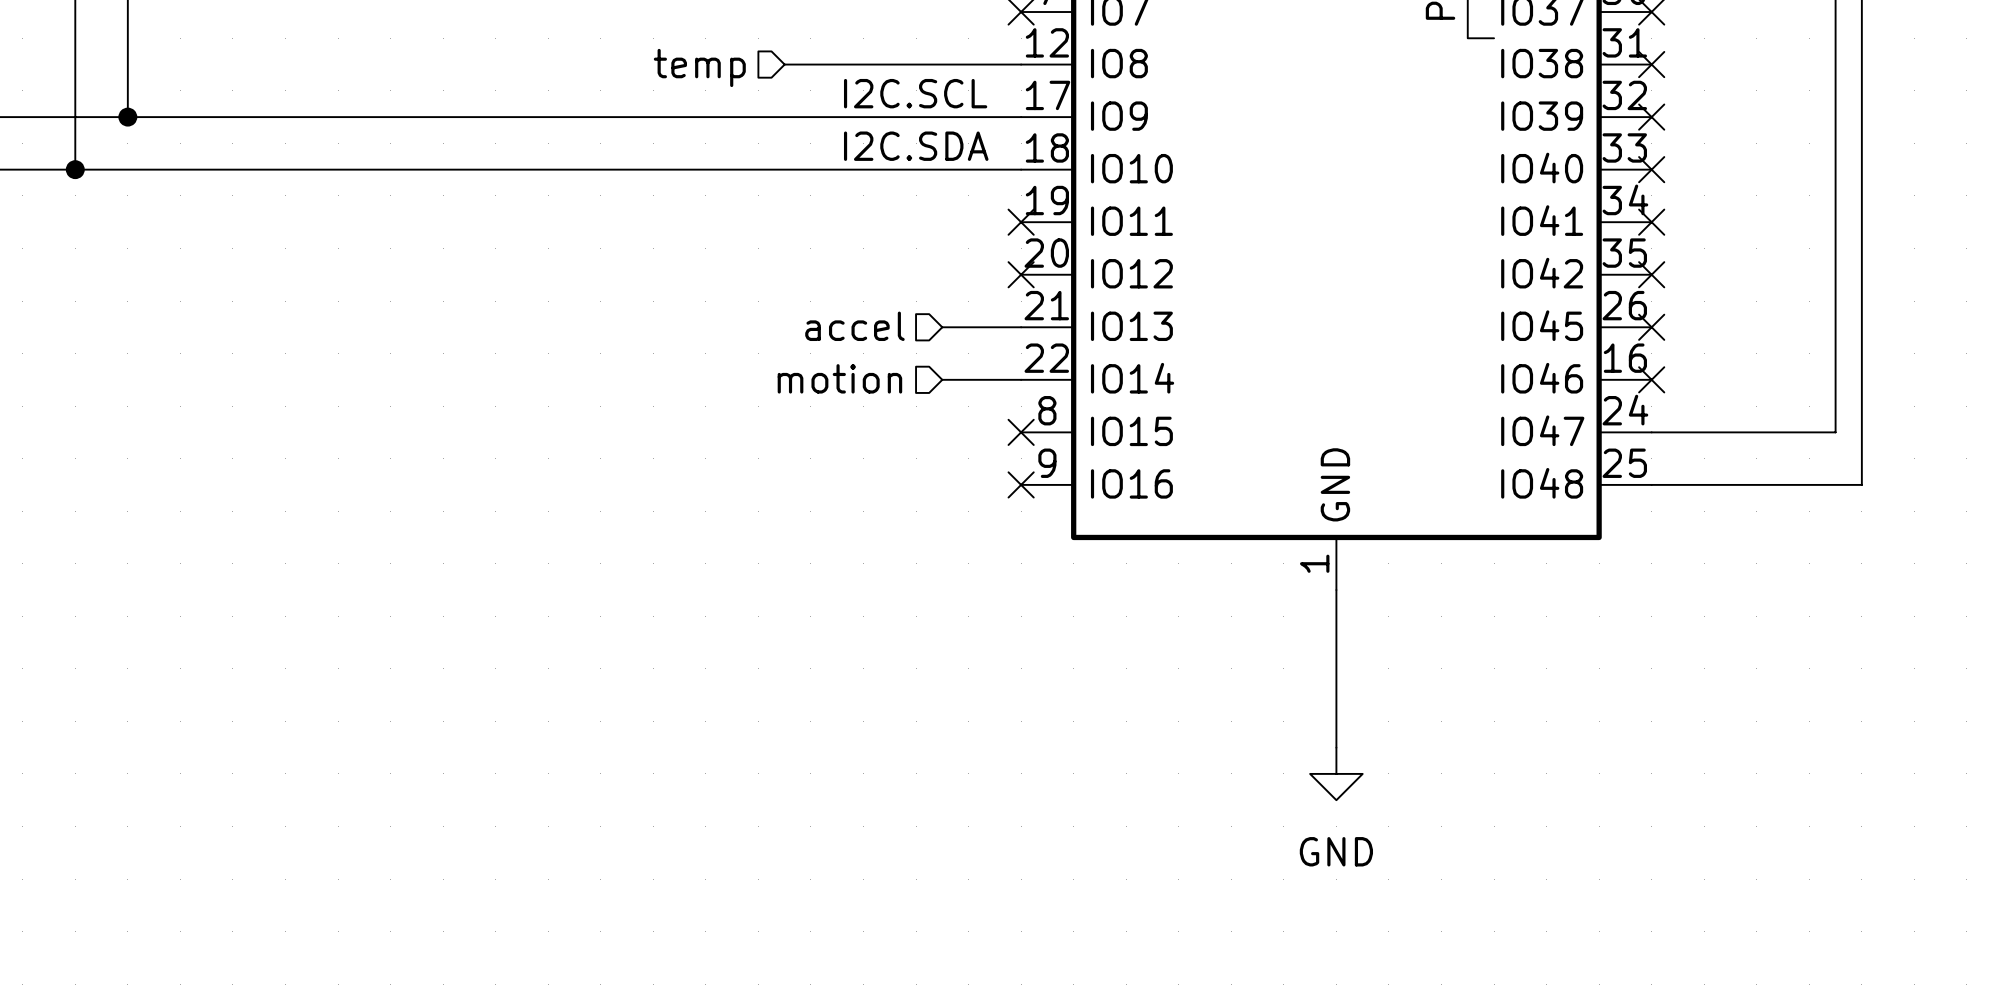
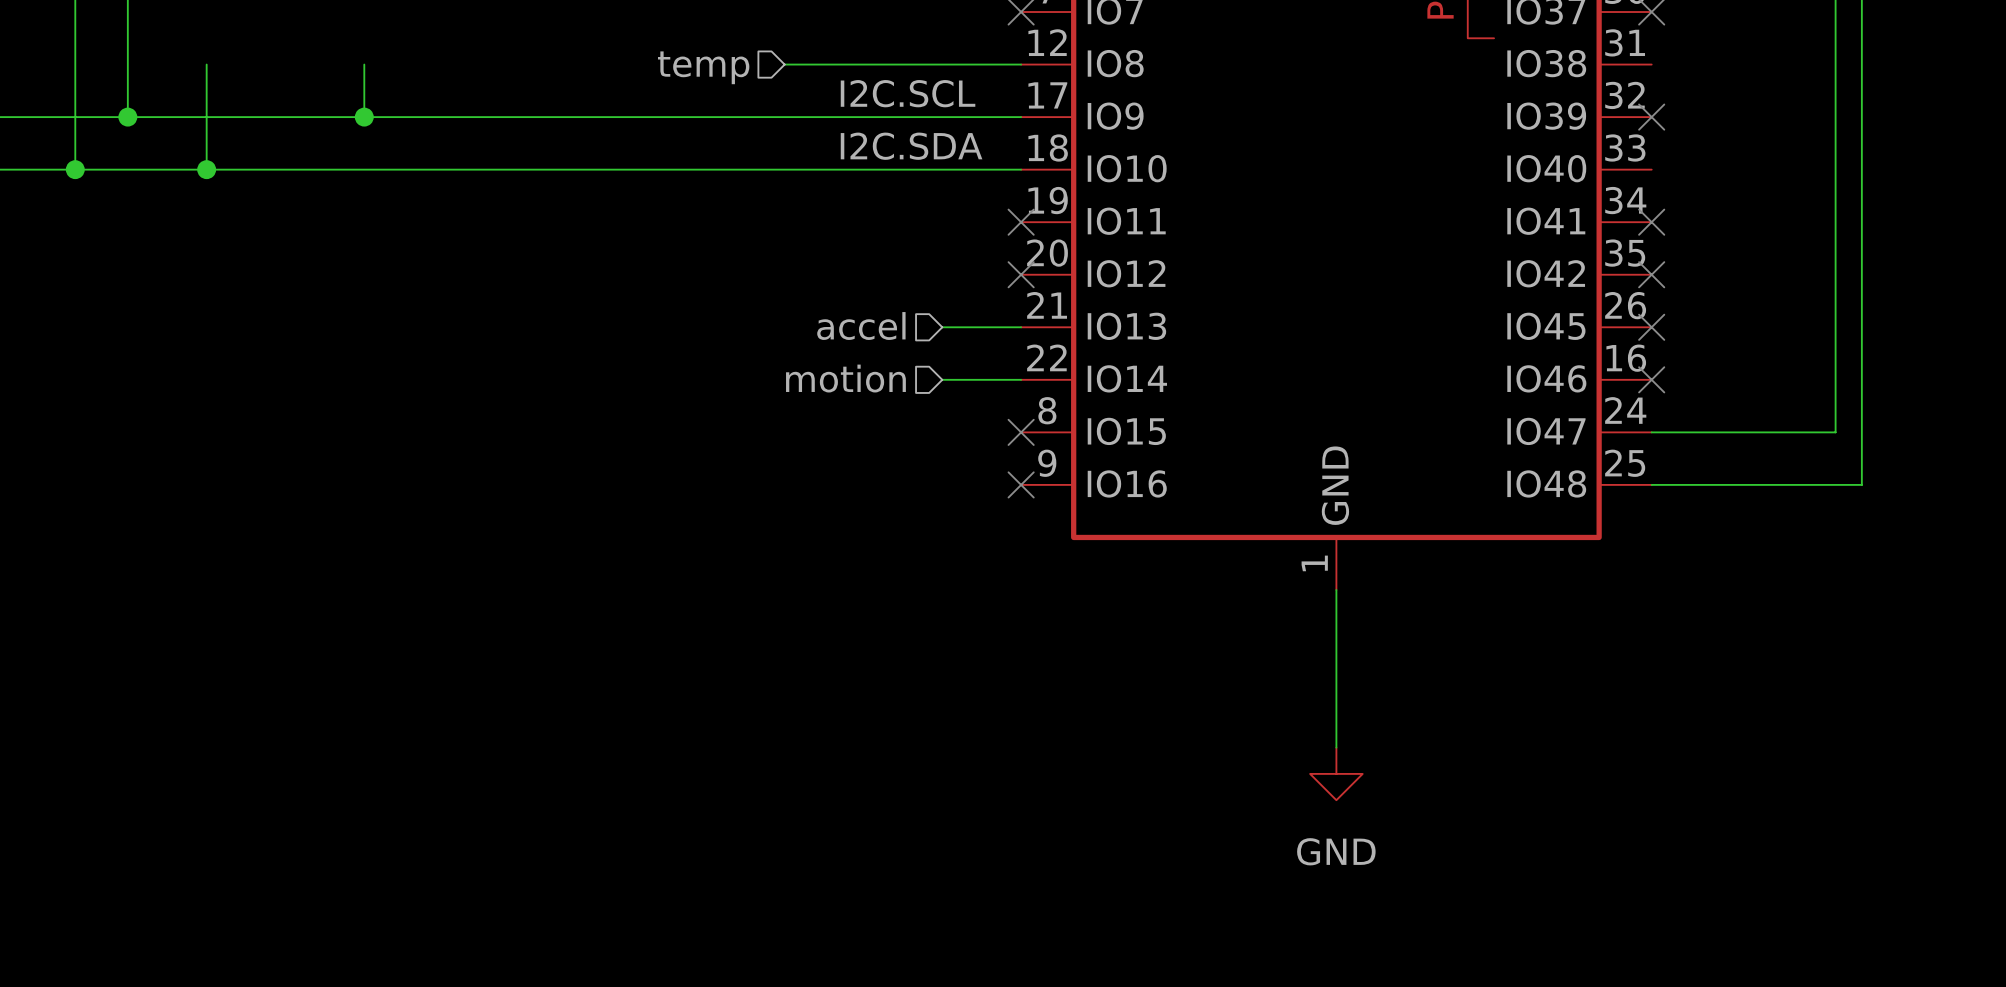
wire: none -> (206, 64) (206, 169)
wire: none -> (364, 64) (364, 117)
no-connect mark: (1651, 64) -> none
junction: none -> (364, 117)
junction: none -> (206, 169)
no-connect mark: (1651, 169) -> none

